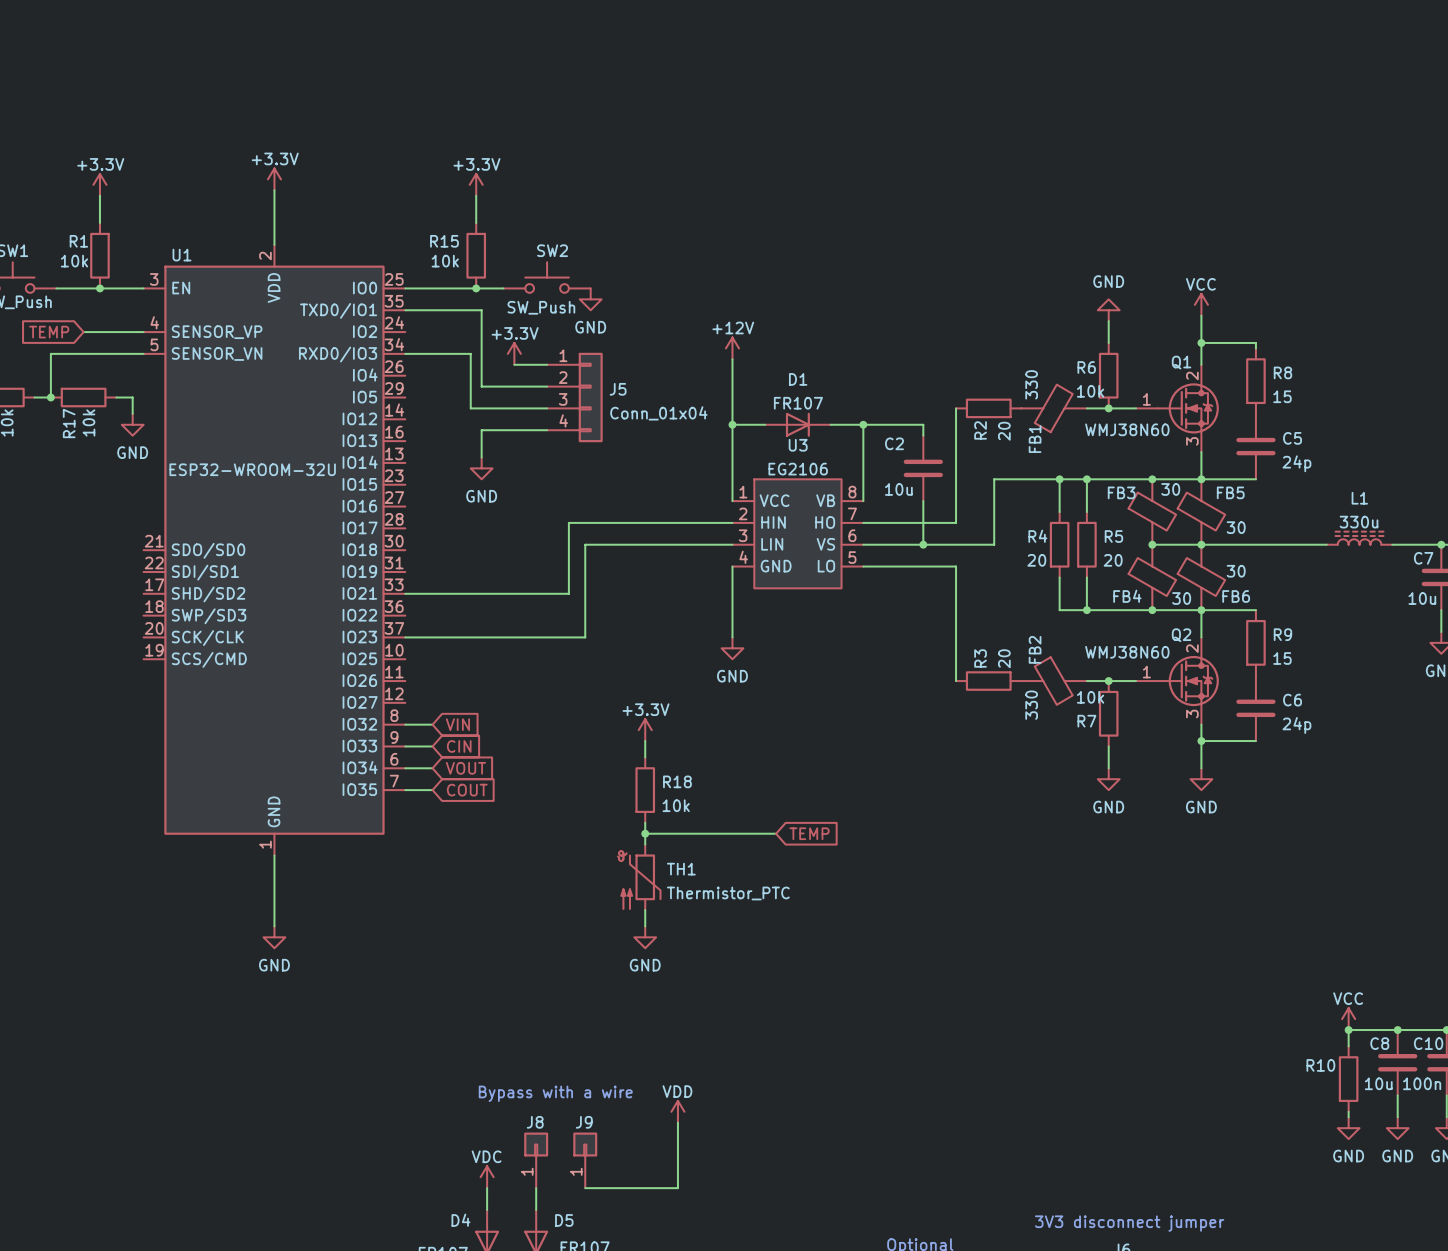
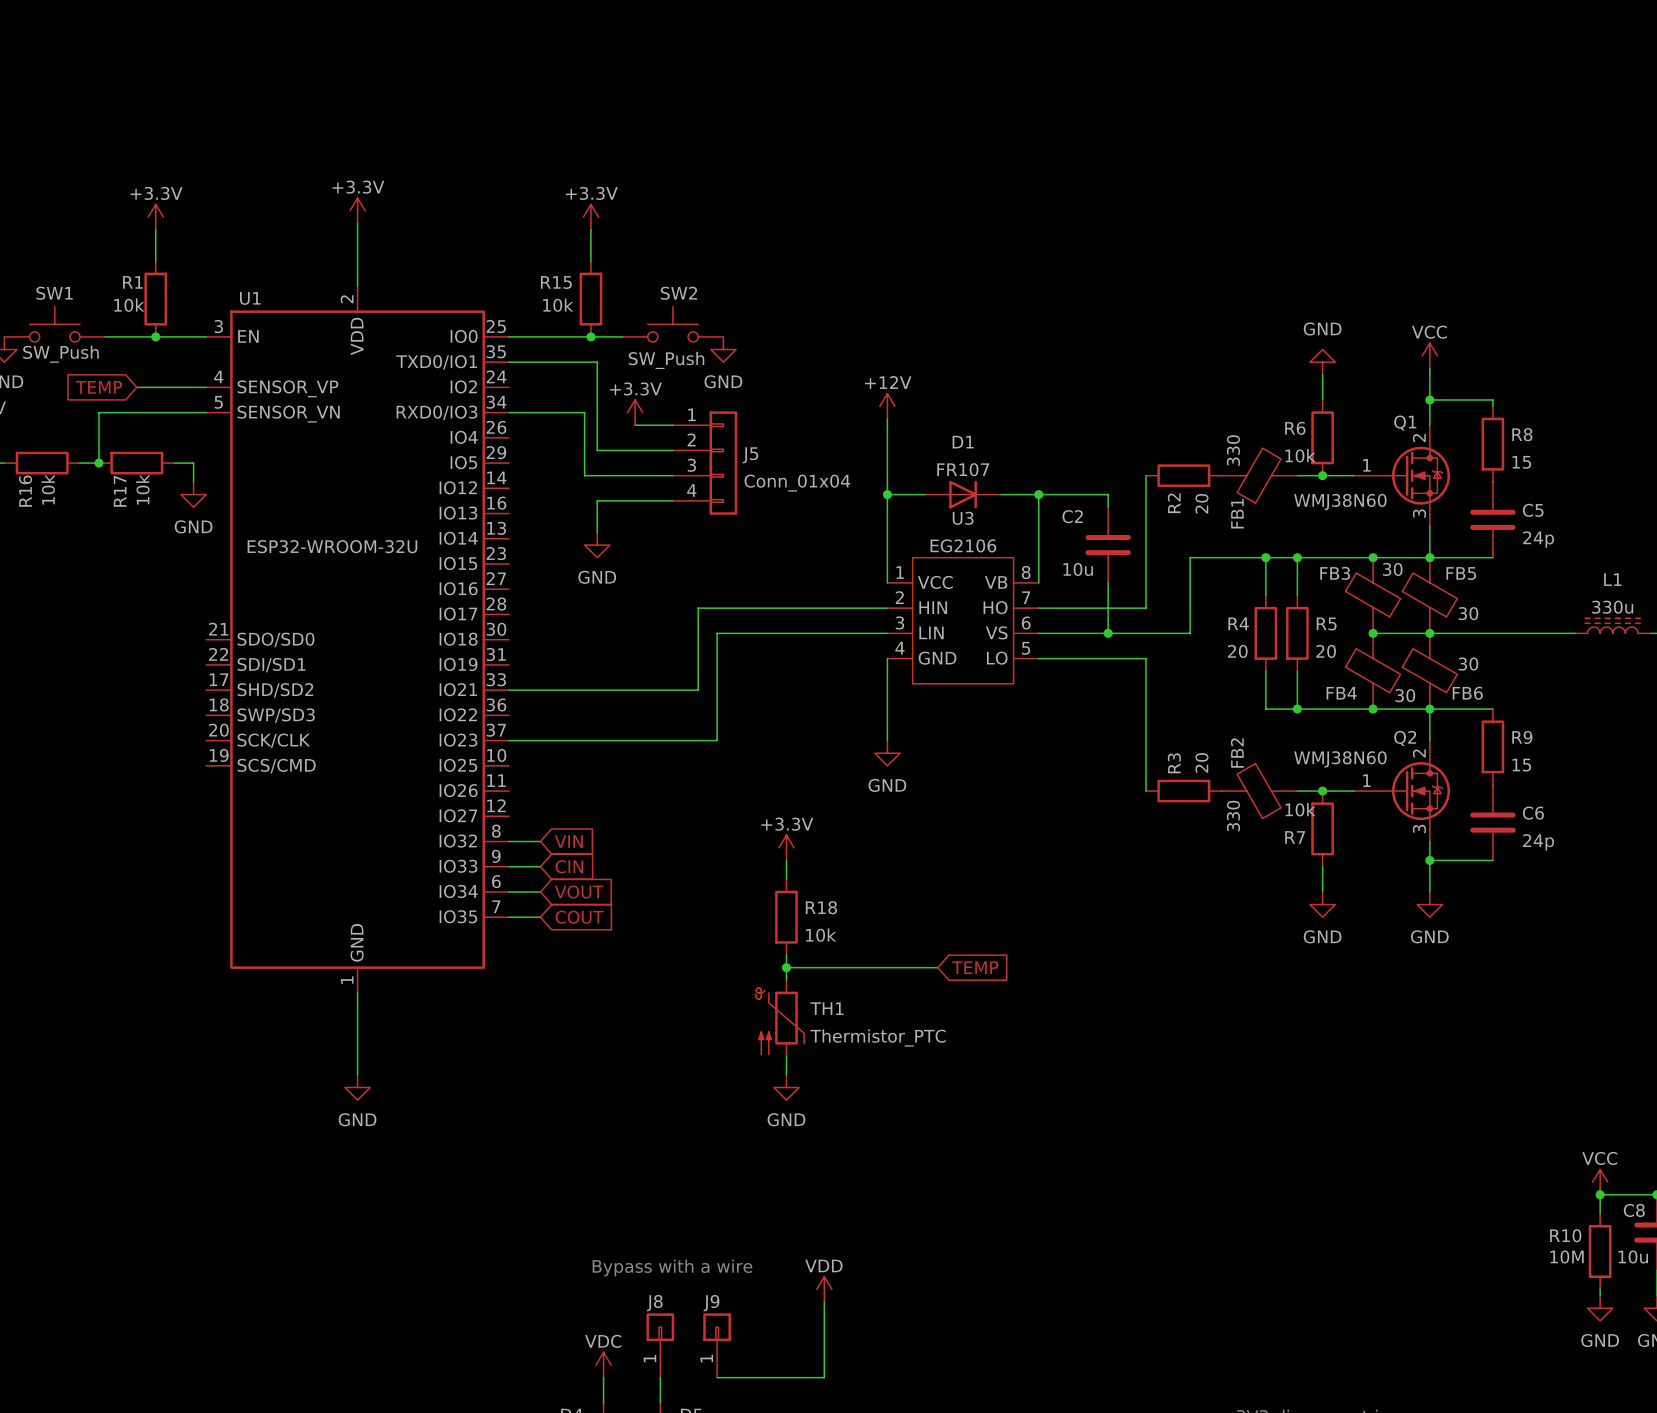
R10 value: none -> 10M (1567, 1256)

